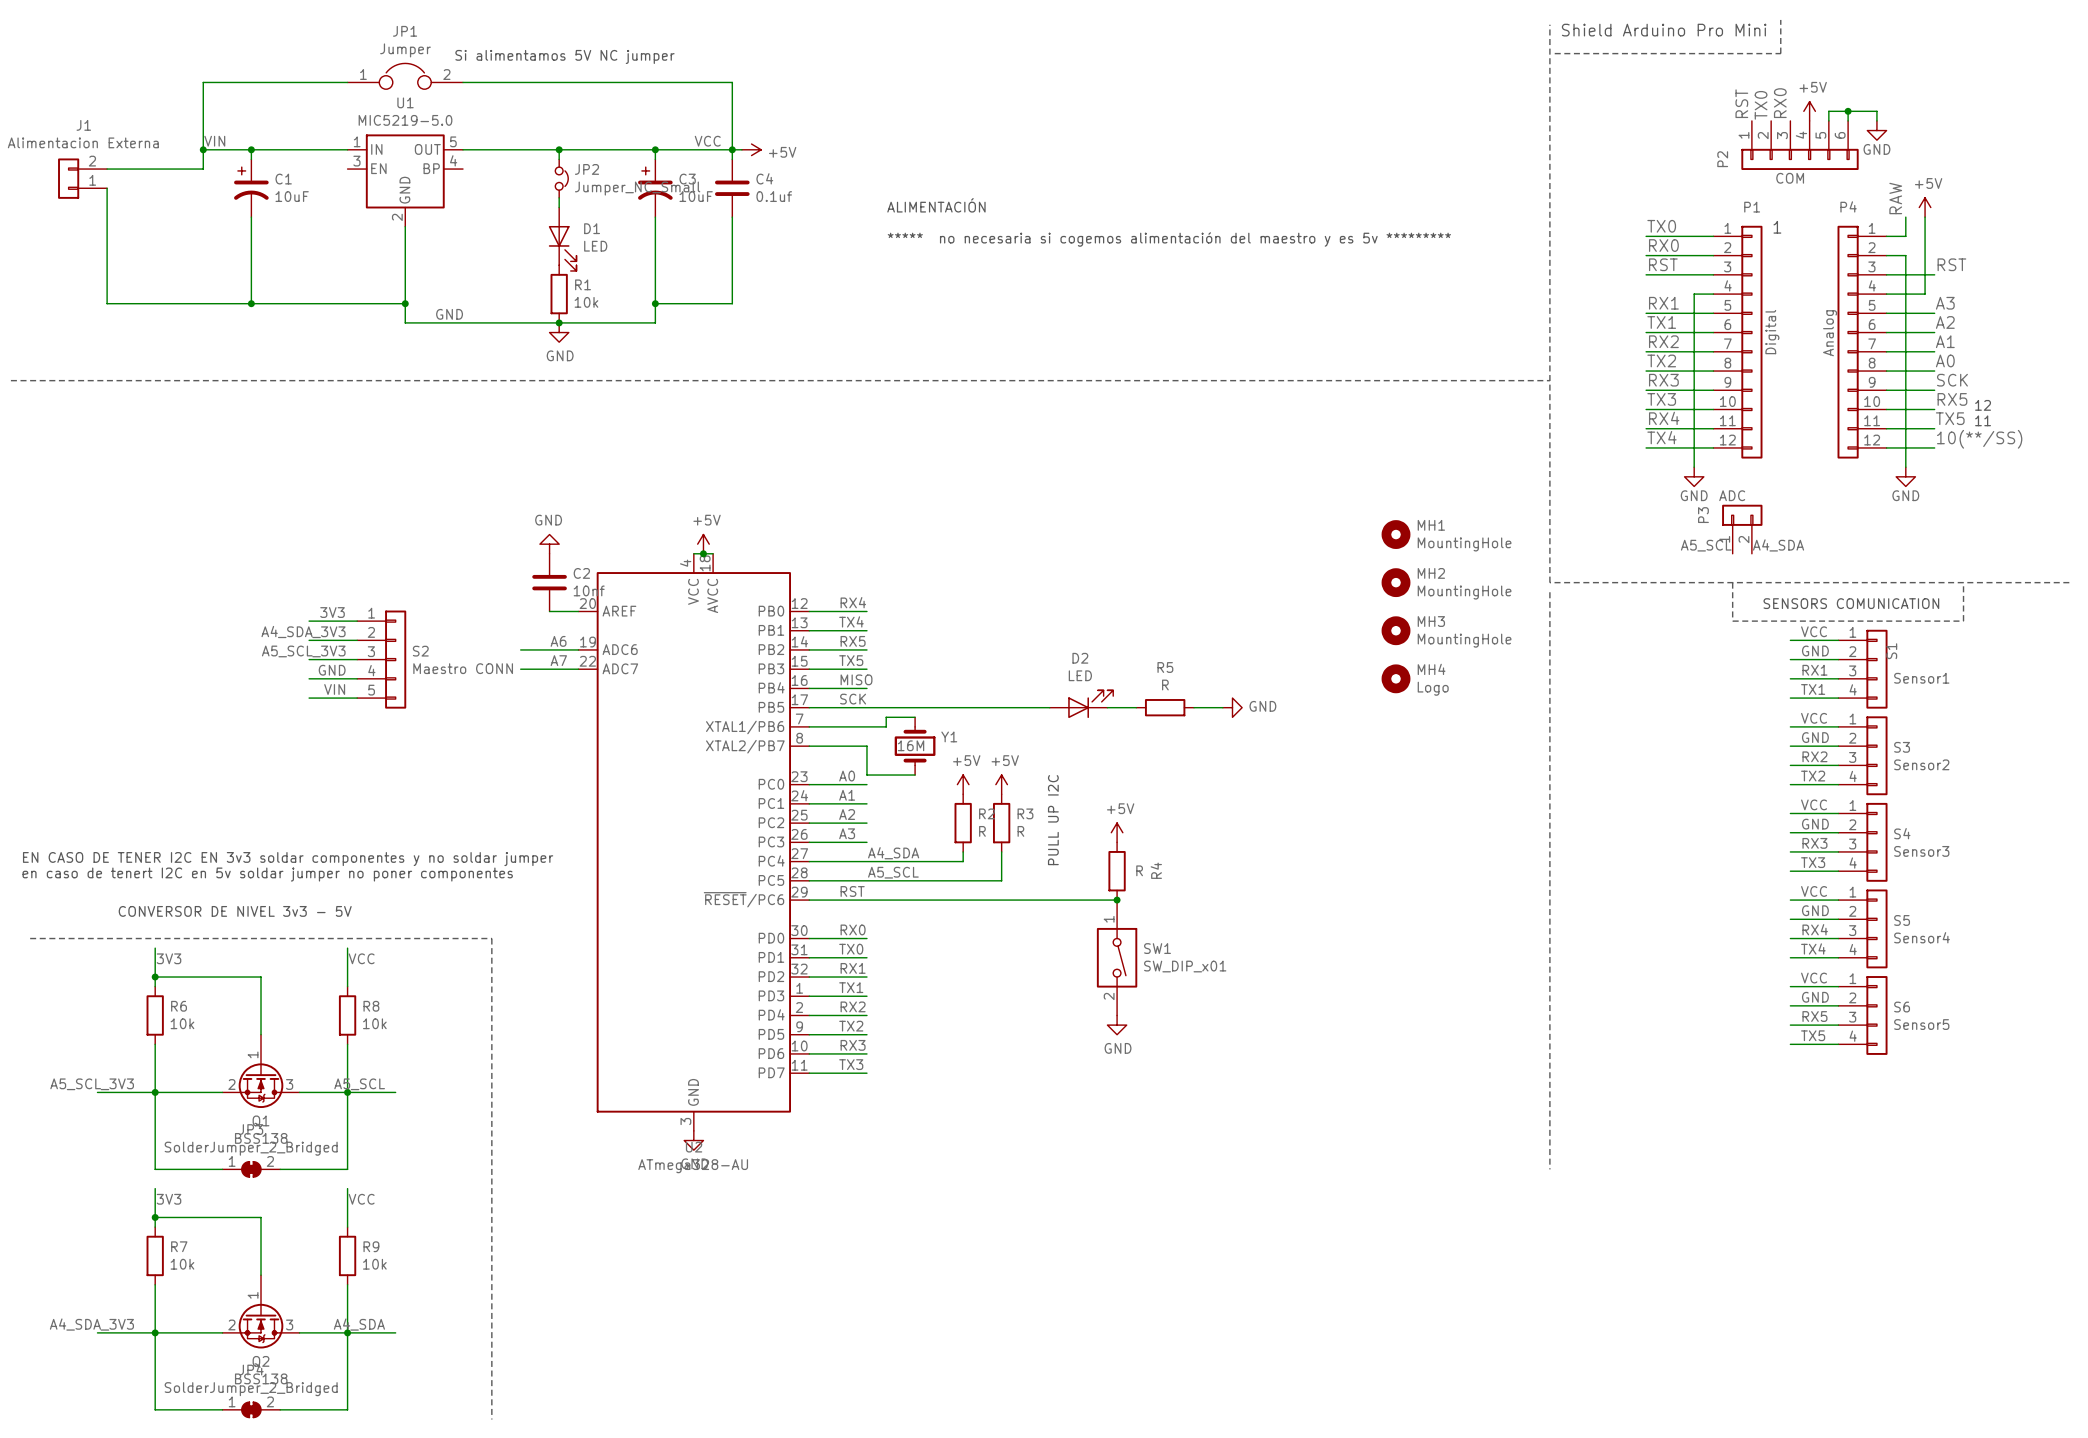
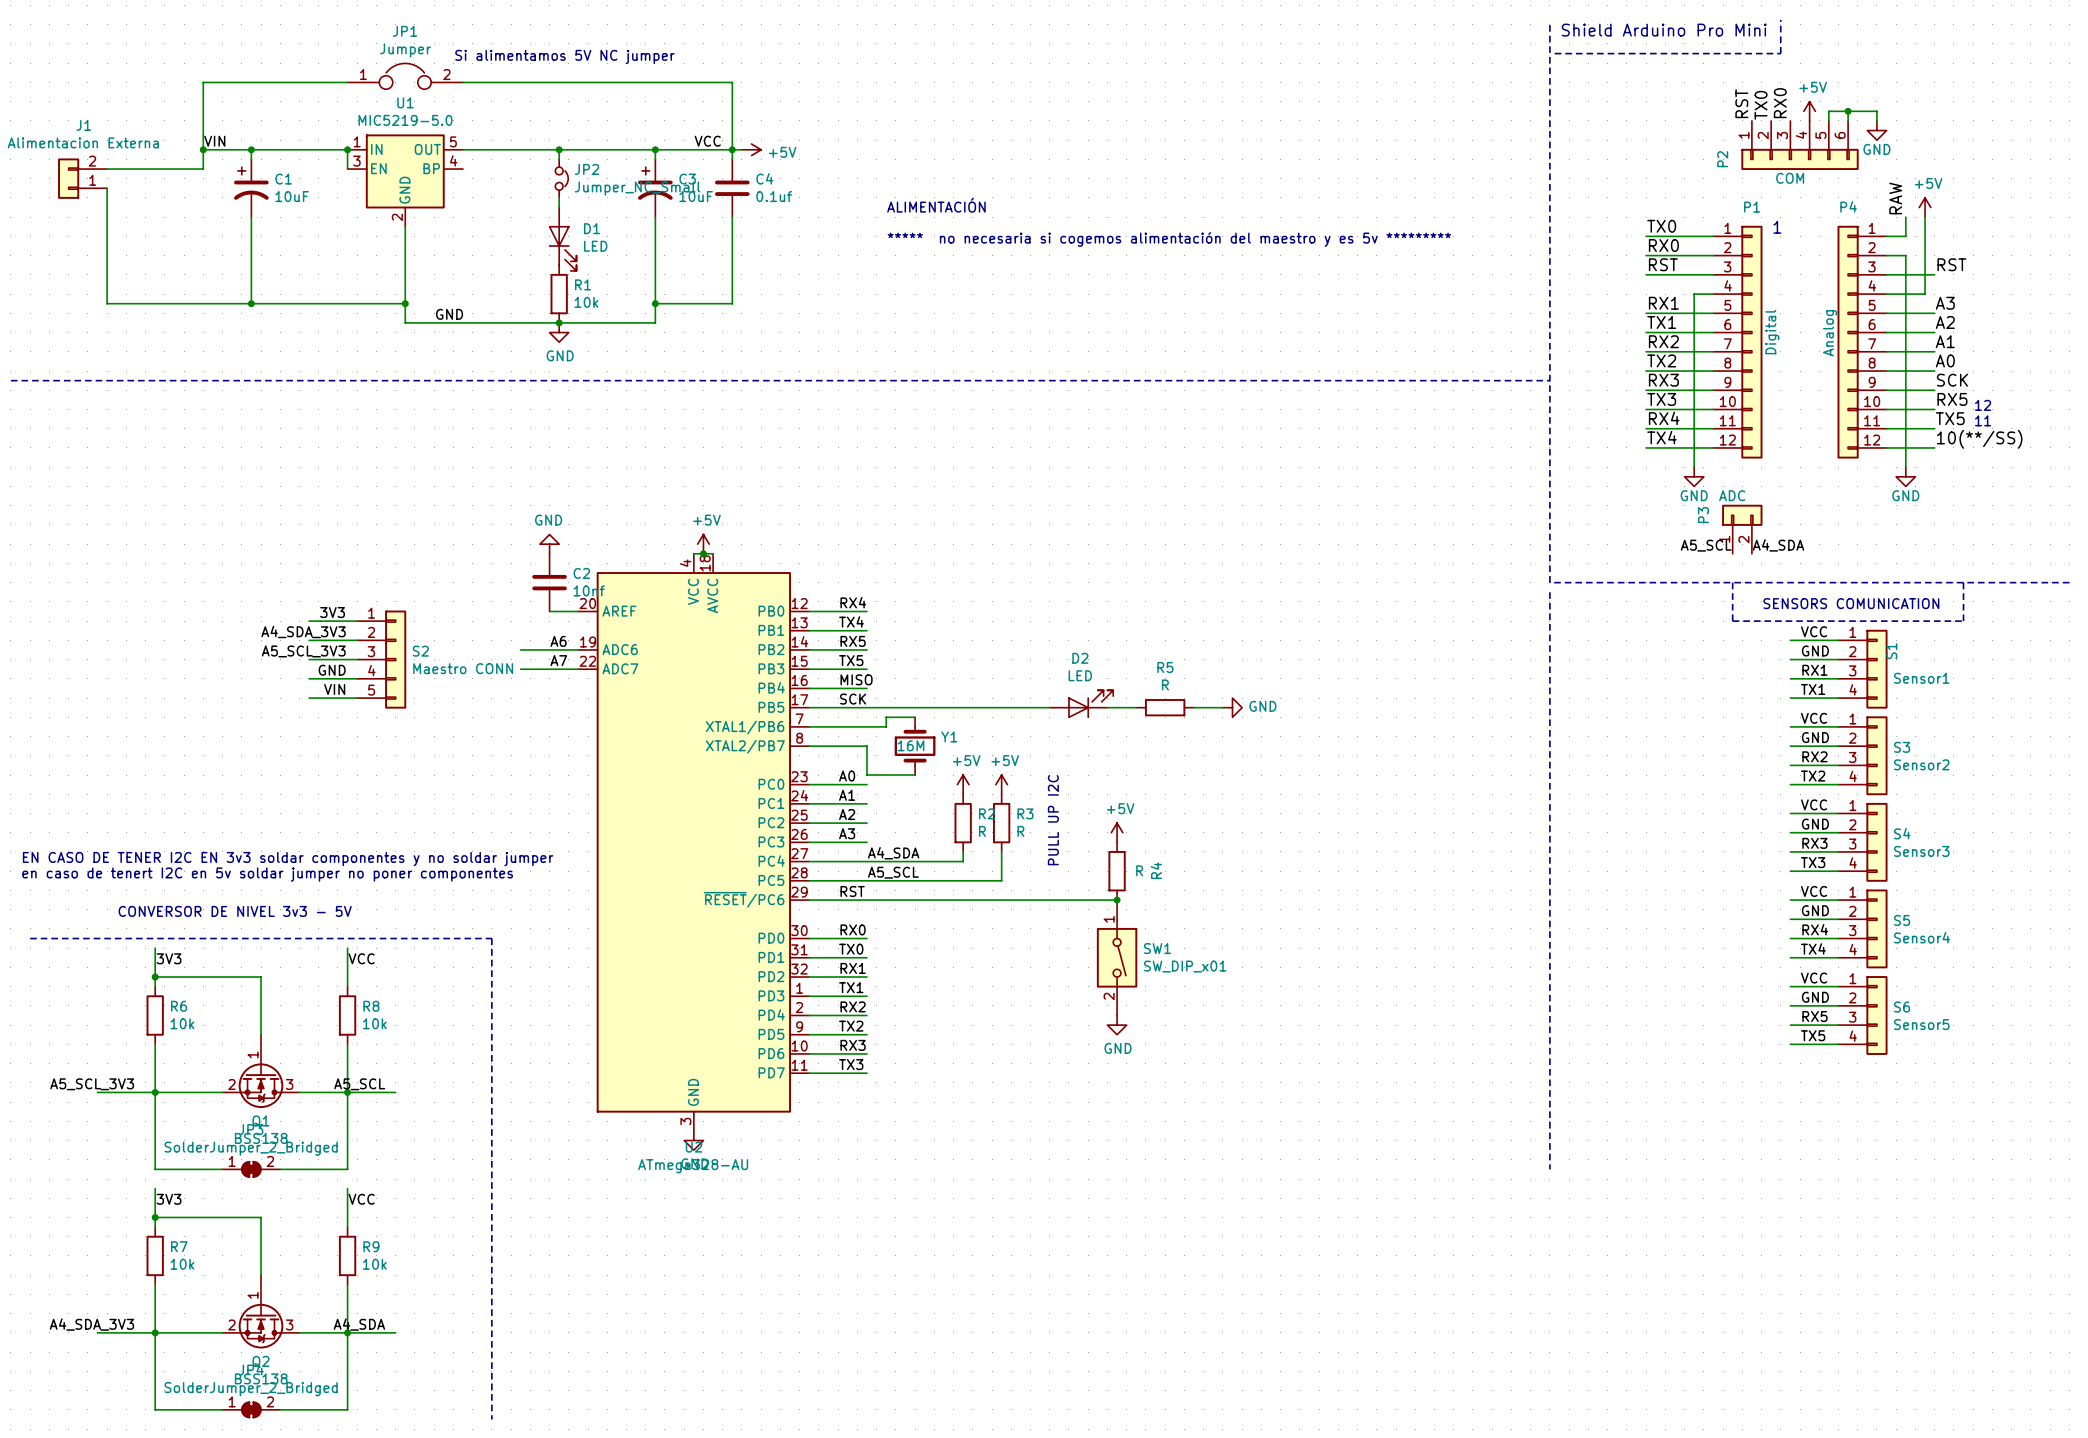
wire: none -> (347, 149) (347, 169)
junction: none -> (347, 149)
MH1: MountingHole (1396, 534) -> none
MH2: MountingHole (1396, 582) -> none
MH3: MountingHole (1396, 630) -> none
MH4: Logo (1396, 678) -> none

